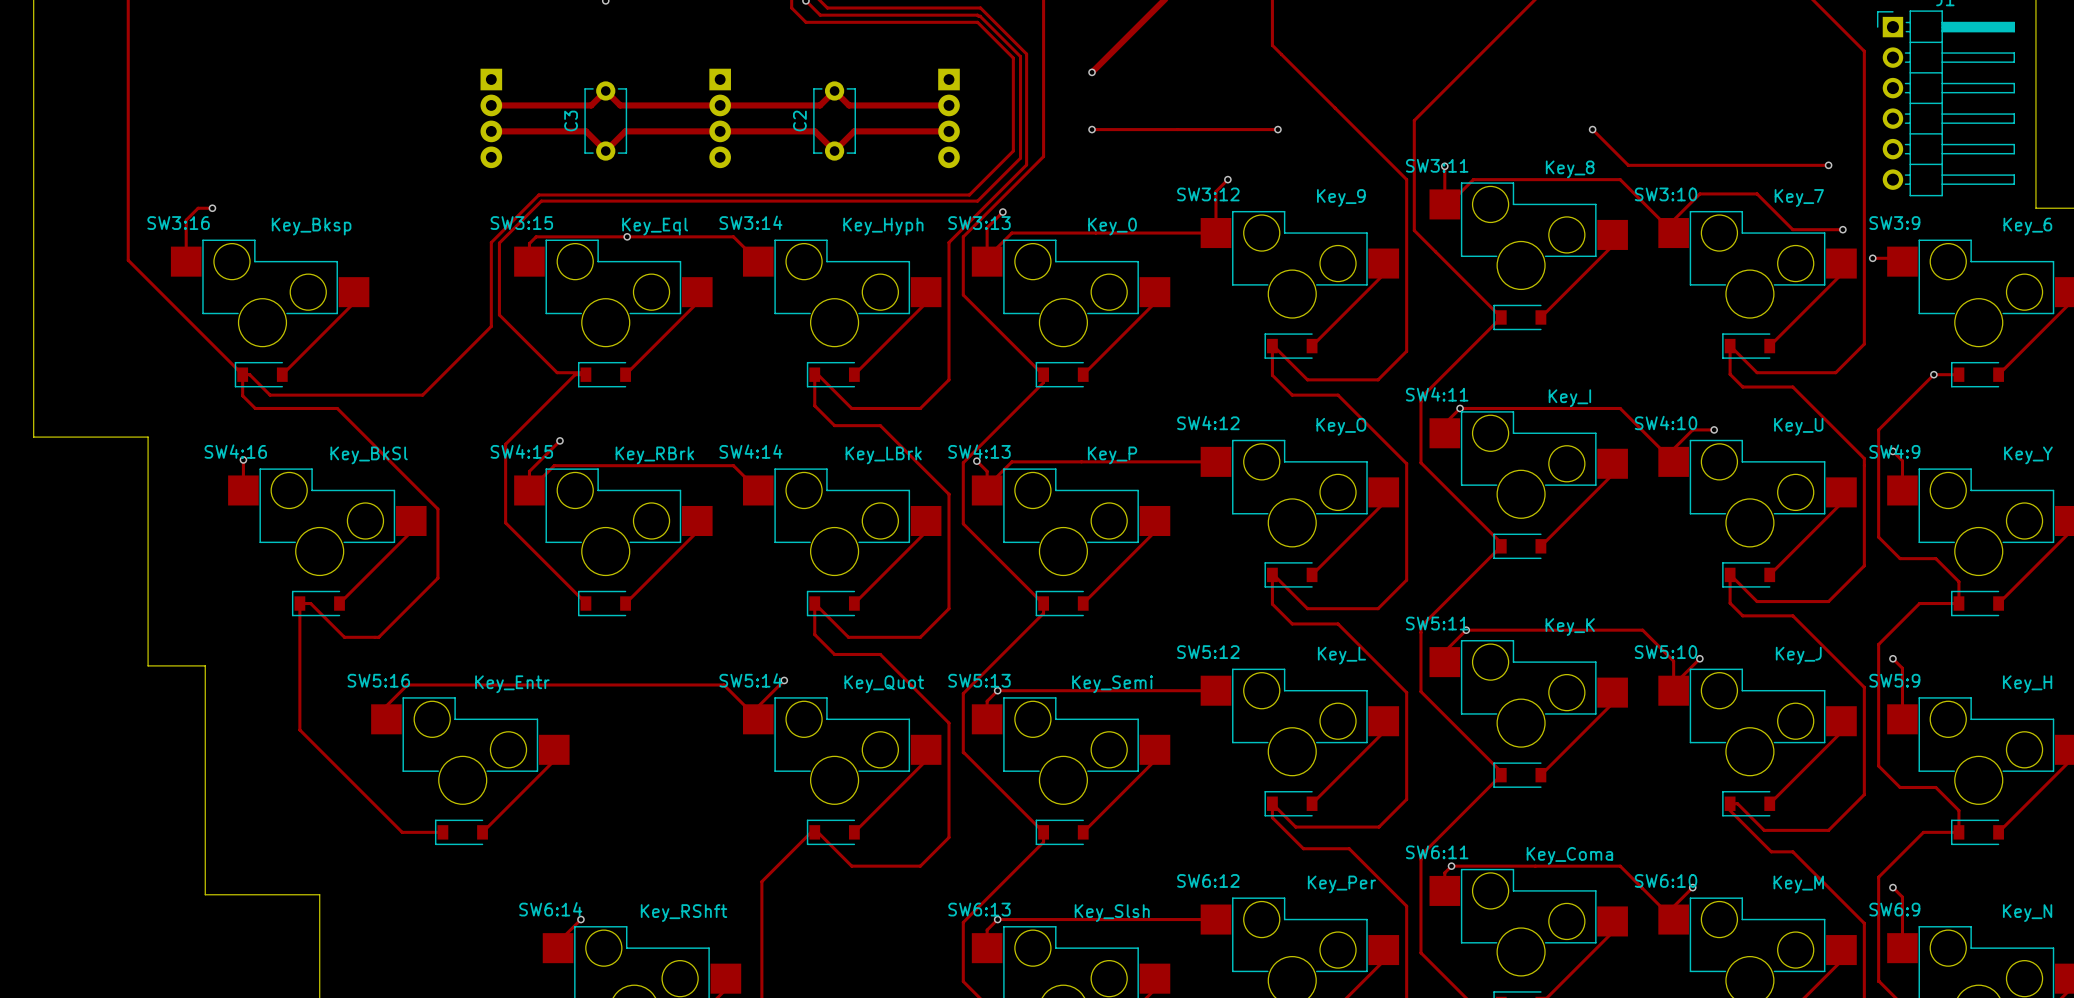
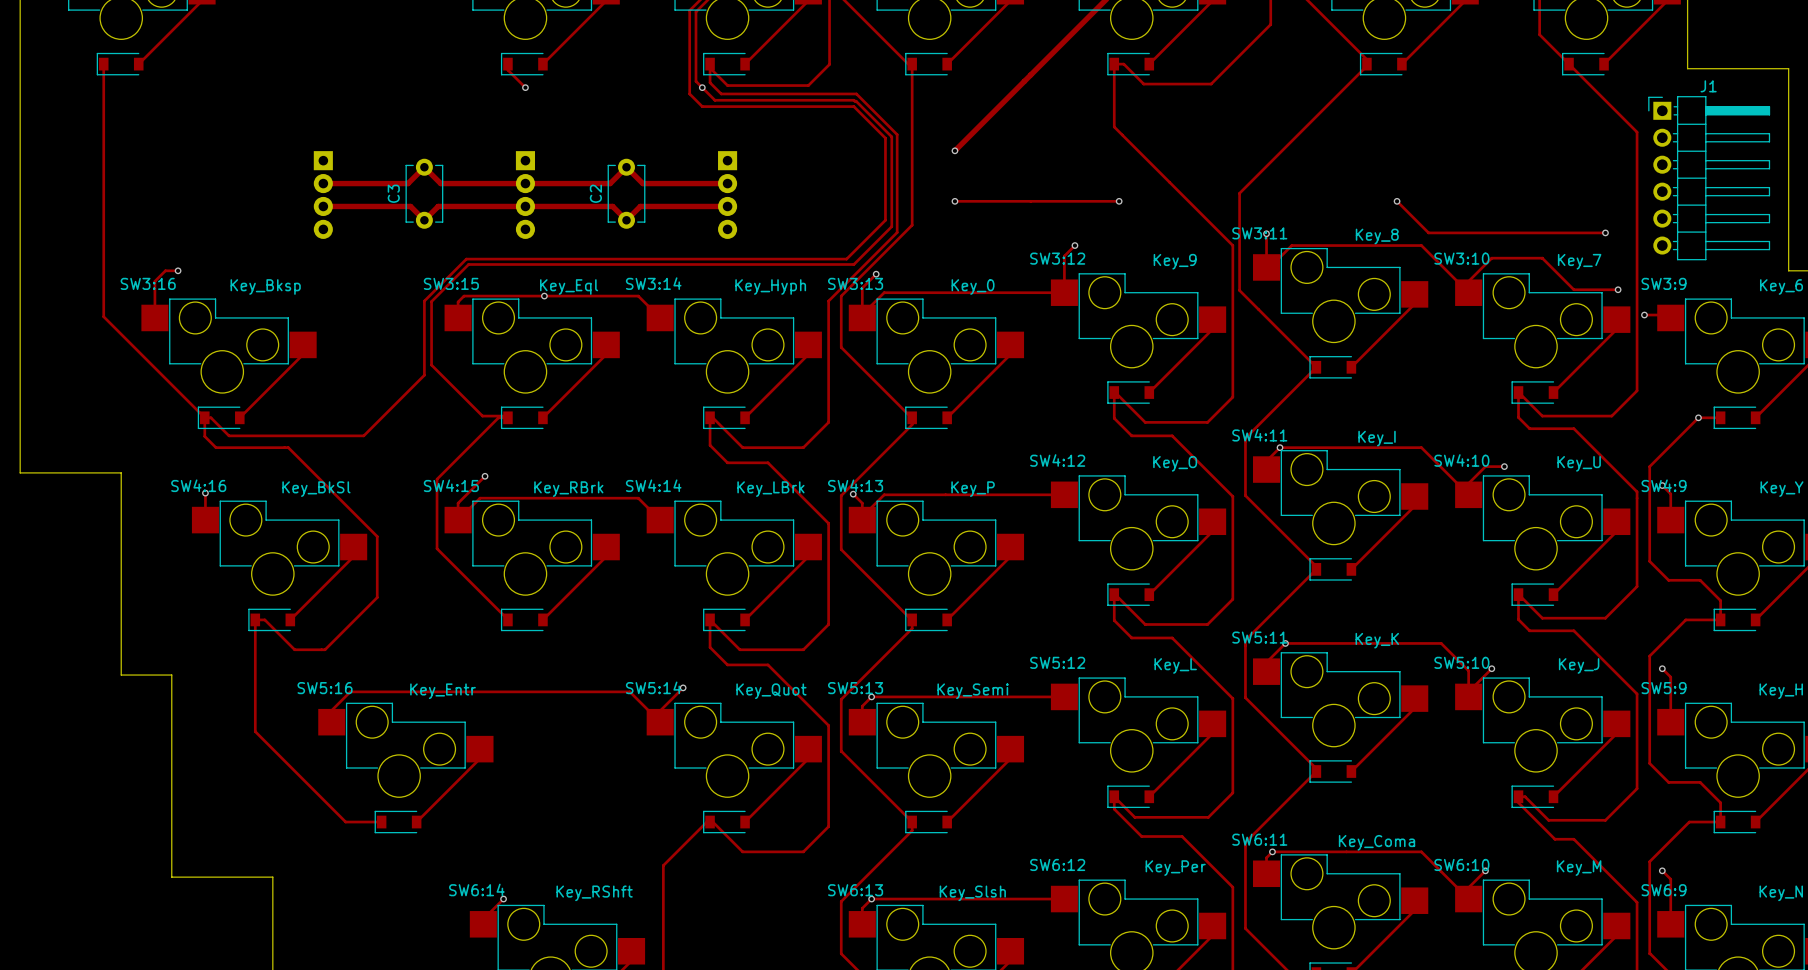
track: (491, 105) (591, 105) (605, 90) (620, 105) (820, 105) (834, 90) (849, 105) (949, 105) -> none
track: none -> (323, 183) (408, 183) (424, 167) (440, 183) (610, 183) (626, 167) (642, 183) (727, 183)
part: (491, 118) -> none
part: (720, 118) -> none
part: (949, 118) -> none
C3 position: (605, 121) -> (424, 193)
C2 position: (834, 121) -> (626, 193)
part: none -> (323, 195)
part: none -> (525, 195)
part: none -> (727, 195)
track: (491, 131) (586, 131) (605, 151) (625, 131) (814, 131) (834, 151) (854, 131) (949, 131) -> none
track: none -> (323, 206) (410, 206) (424, 220) (438, 206) (612, 206) (626, 220) (640, 206) (727, 206)

